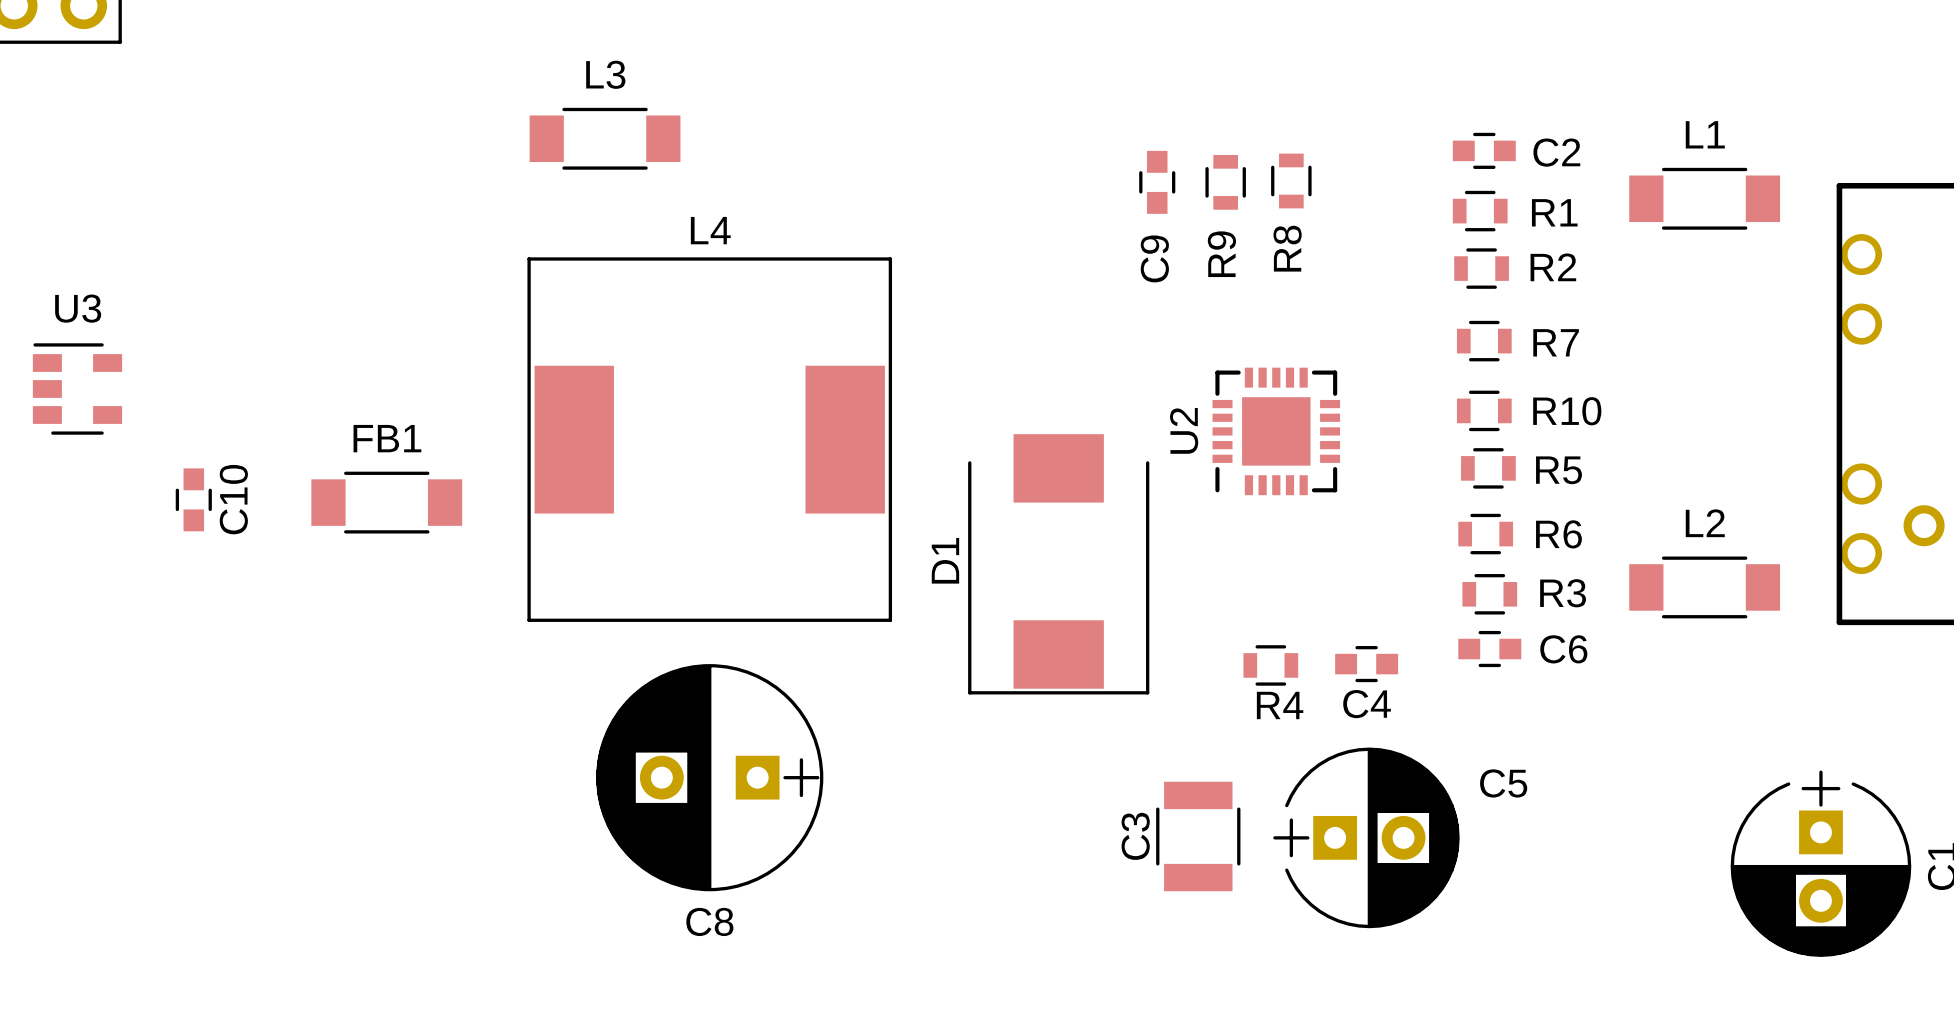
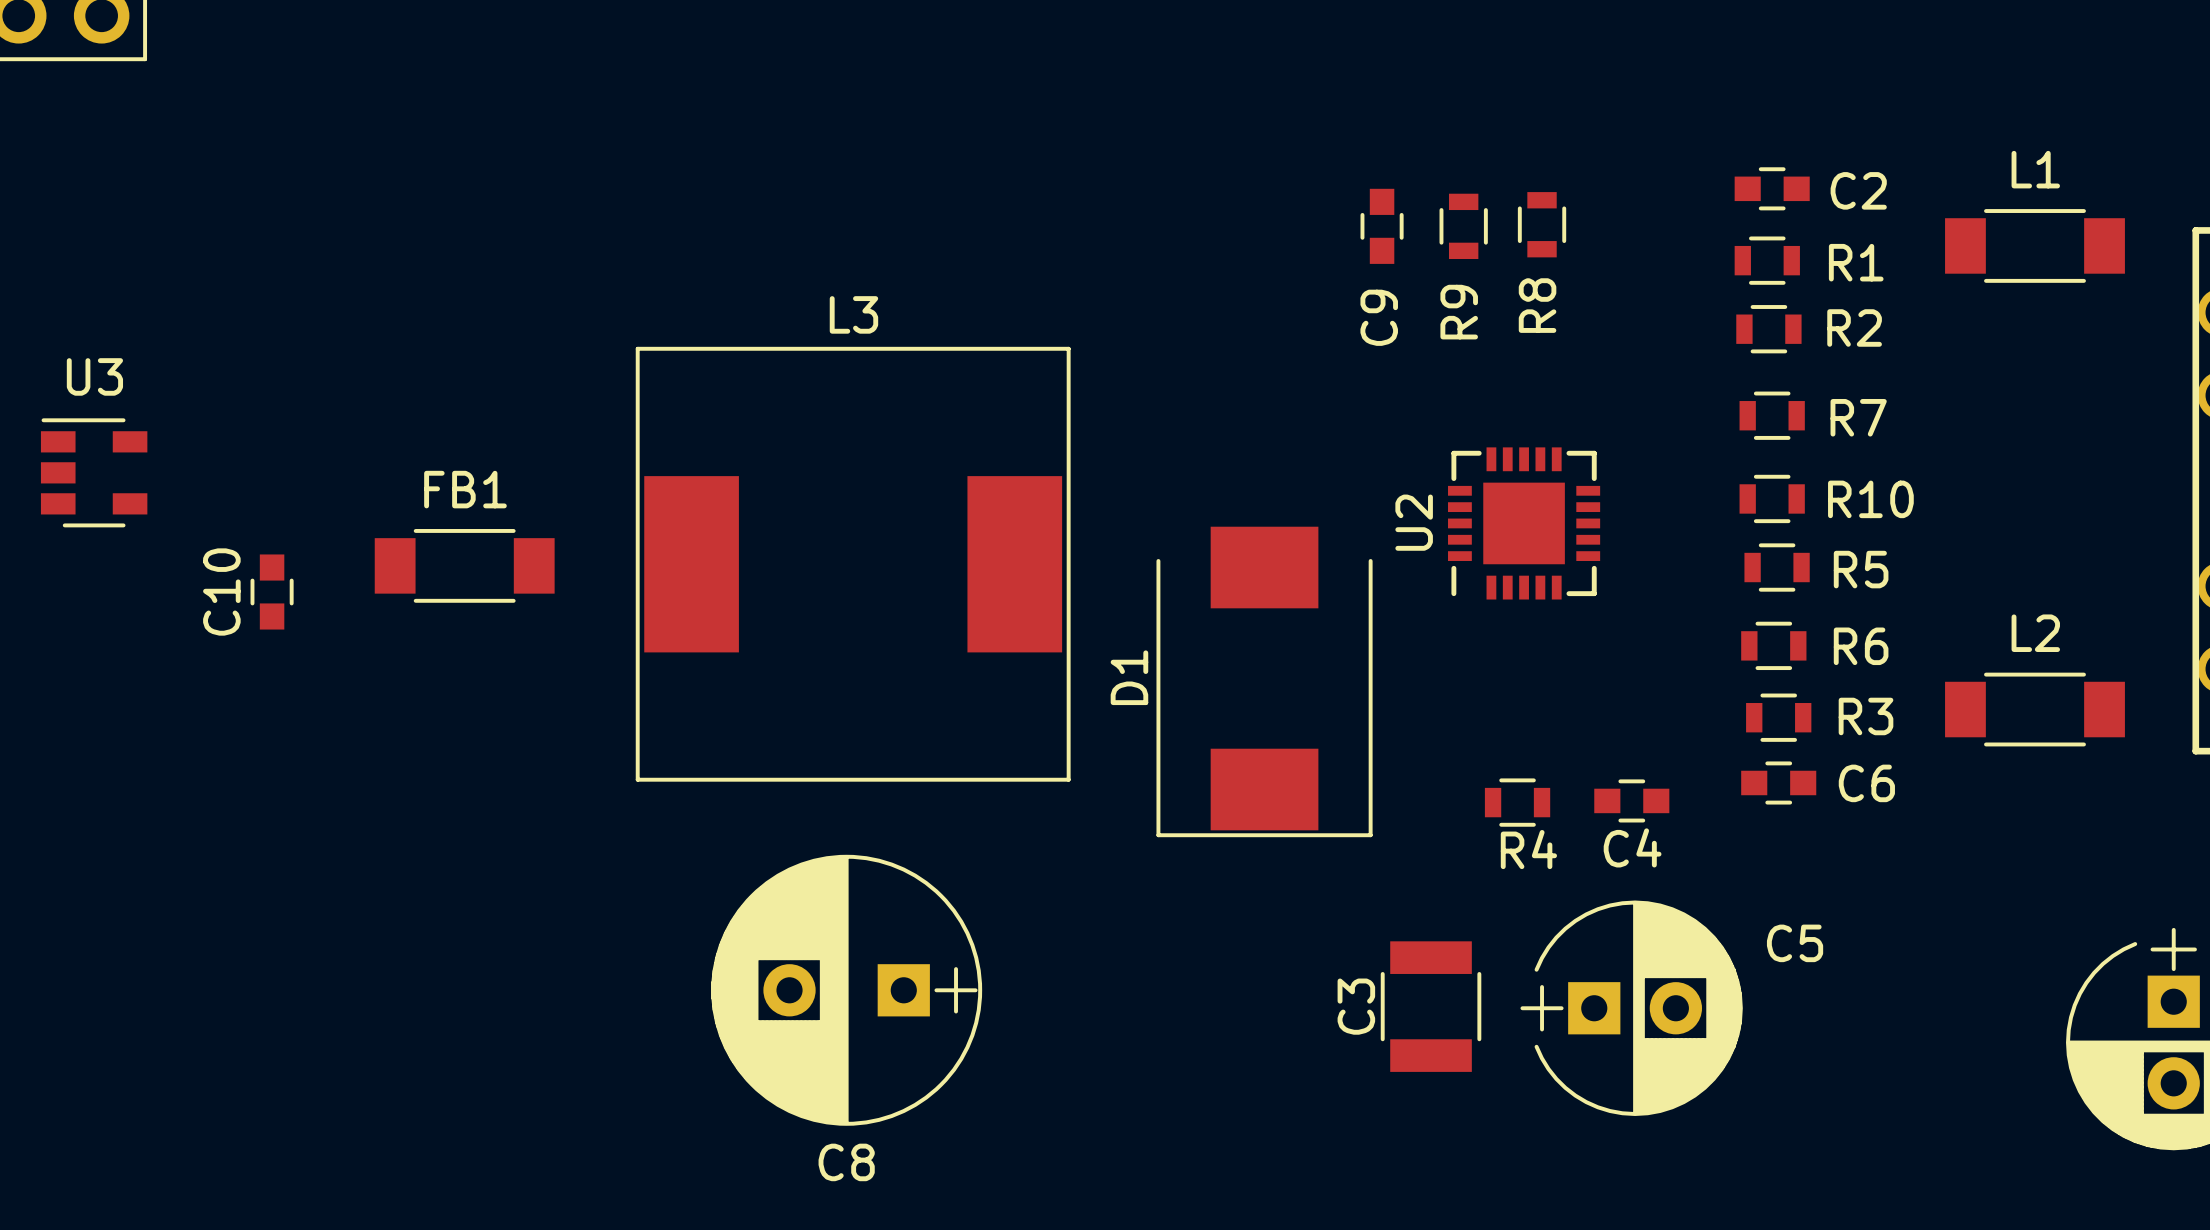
L3 name position: L3 (605, 74) -> L3 (853, 314)
L3 footprint: [529, 107, 681, 170] -> [635, 346, 1071, 782]
L4: (709, 439) -> none
C10 position: (193, 499) -> (272, 592)
C10 name position: C10 (233, 499) -> C10 (221, 592)
FB1 position: (386, 502) -> (464, 565)
C8 position: (709, 777) -> (846, 990)

